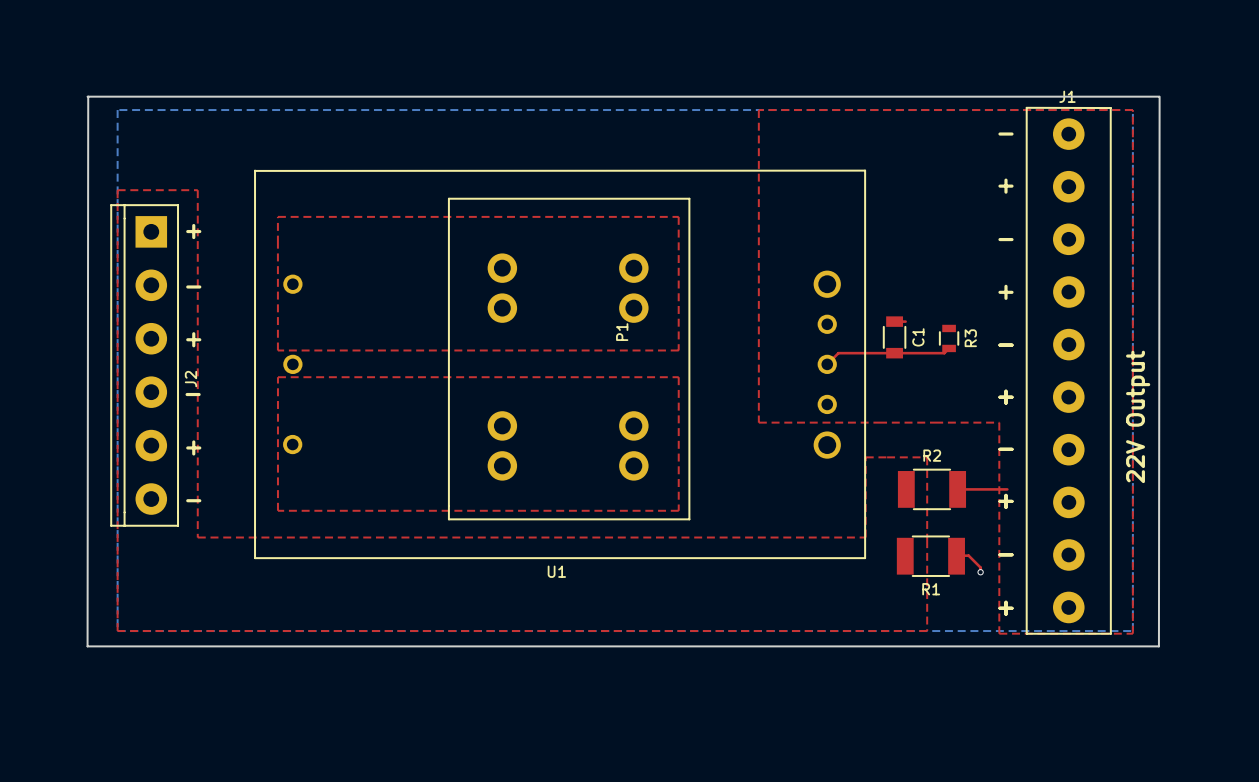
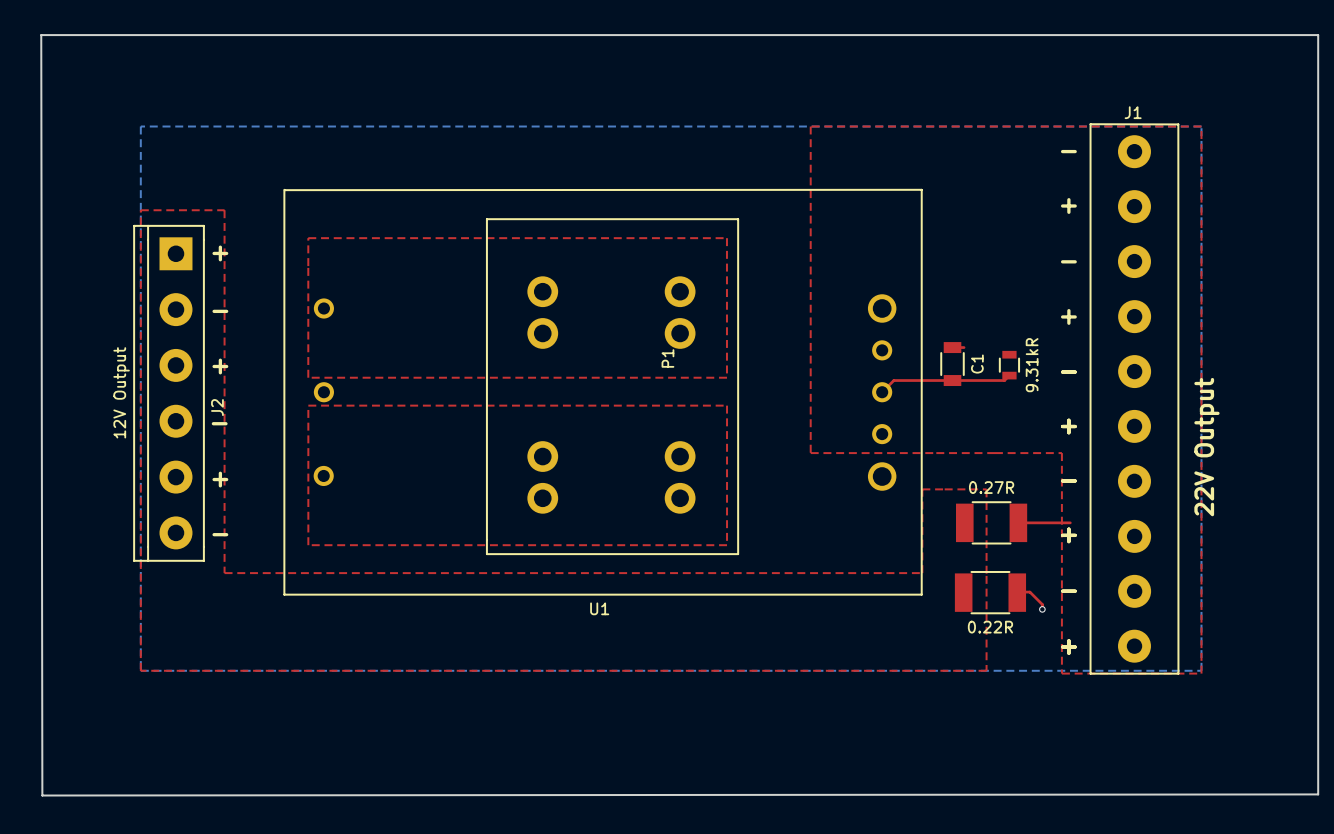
board edge: none -> (41, 35) (42, 795) (1318, 794) (1318, 35) (41, 35)
board edge: (87, 96) (1158, 96) -> none
board edge: (88, 96) (87, 646) (1158, 646) (1159, 96) -> none
R3 name: R3 (970, 338) -> 9.31kR (1032, 365)
J2 value: none -> 12V Output (121, 392)
R2 name: R2 (932, 455) -> 0.27R (991, 487)
R1 name: R1 (931, 589) -> 0.22R (990, 627)

